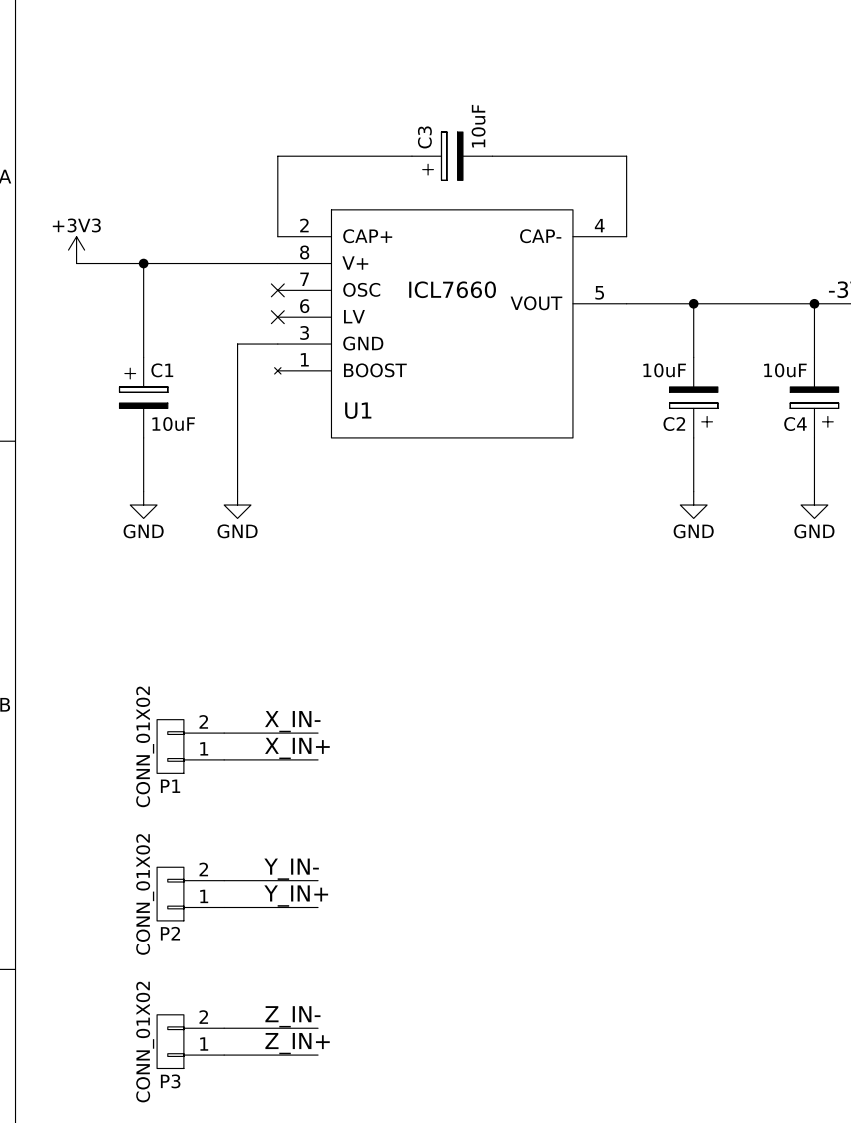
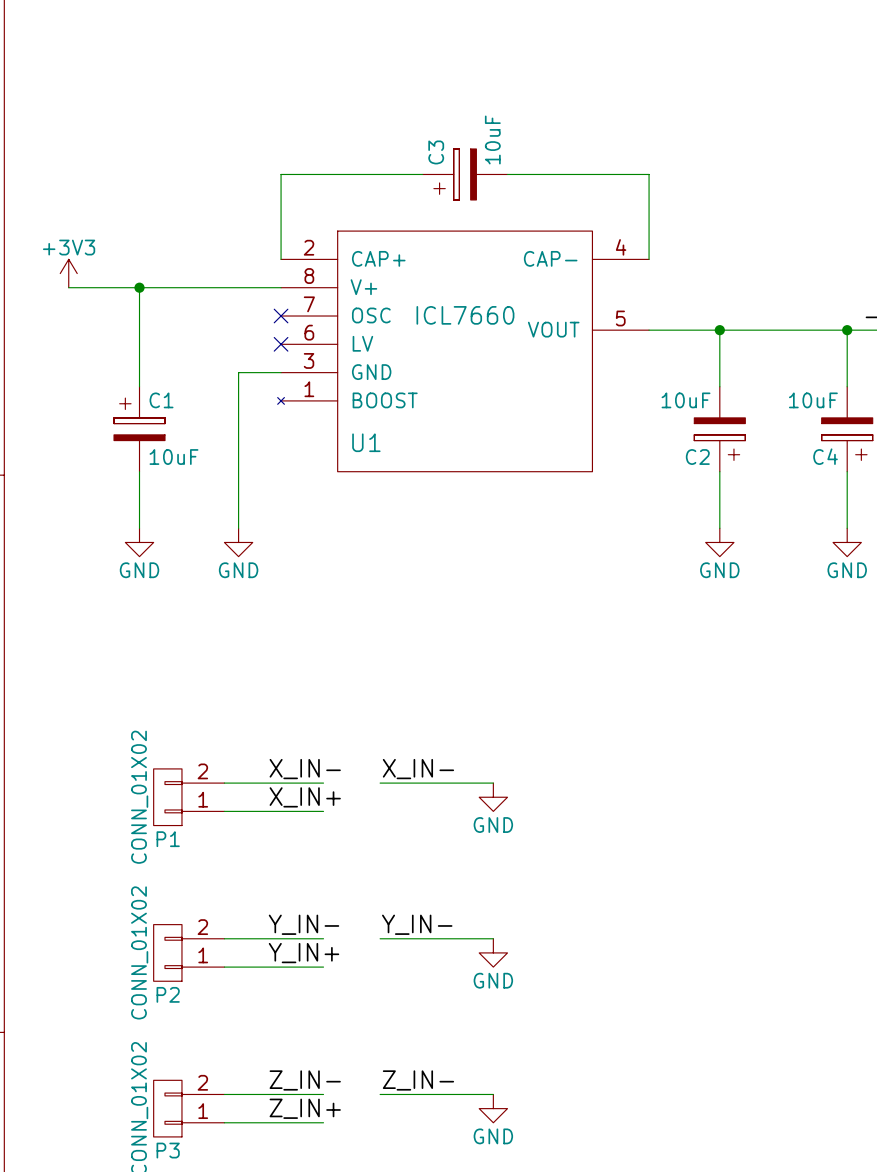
label: none -> X_IN- (418, 769)
wire: none -> (380, 783) (493, 783)
power symbol: none -> GND (493, 797)
label: none -> Y_IN- (417, 924)
wire: none -> (380, 938) (493, 938)
power symbol: none -> GND (493, 952)
label: none -> Z_IN- (418, 1080)
wire: none -> (380, 1094) (493, 1094)
power symbol: none -> GND (493, 1108)

